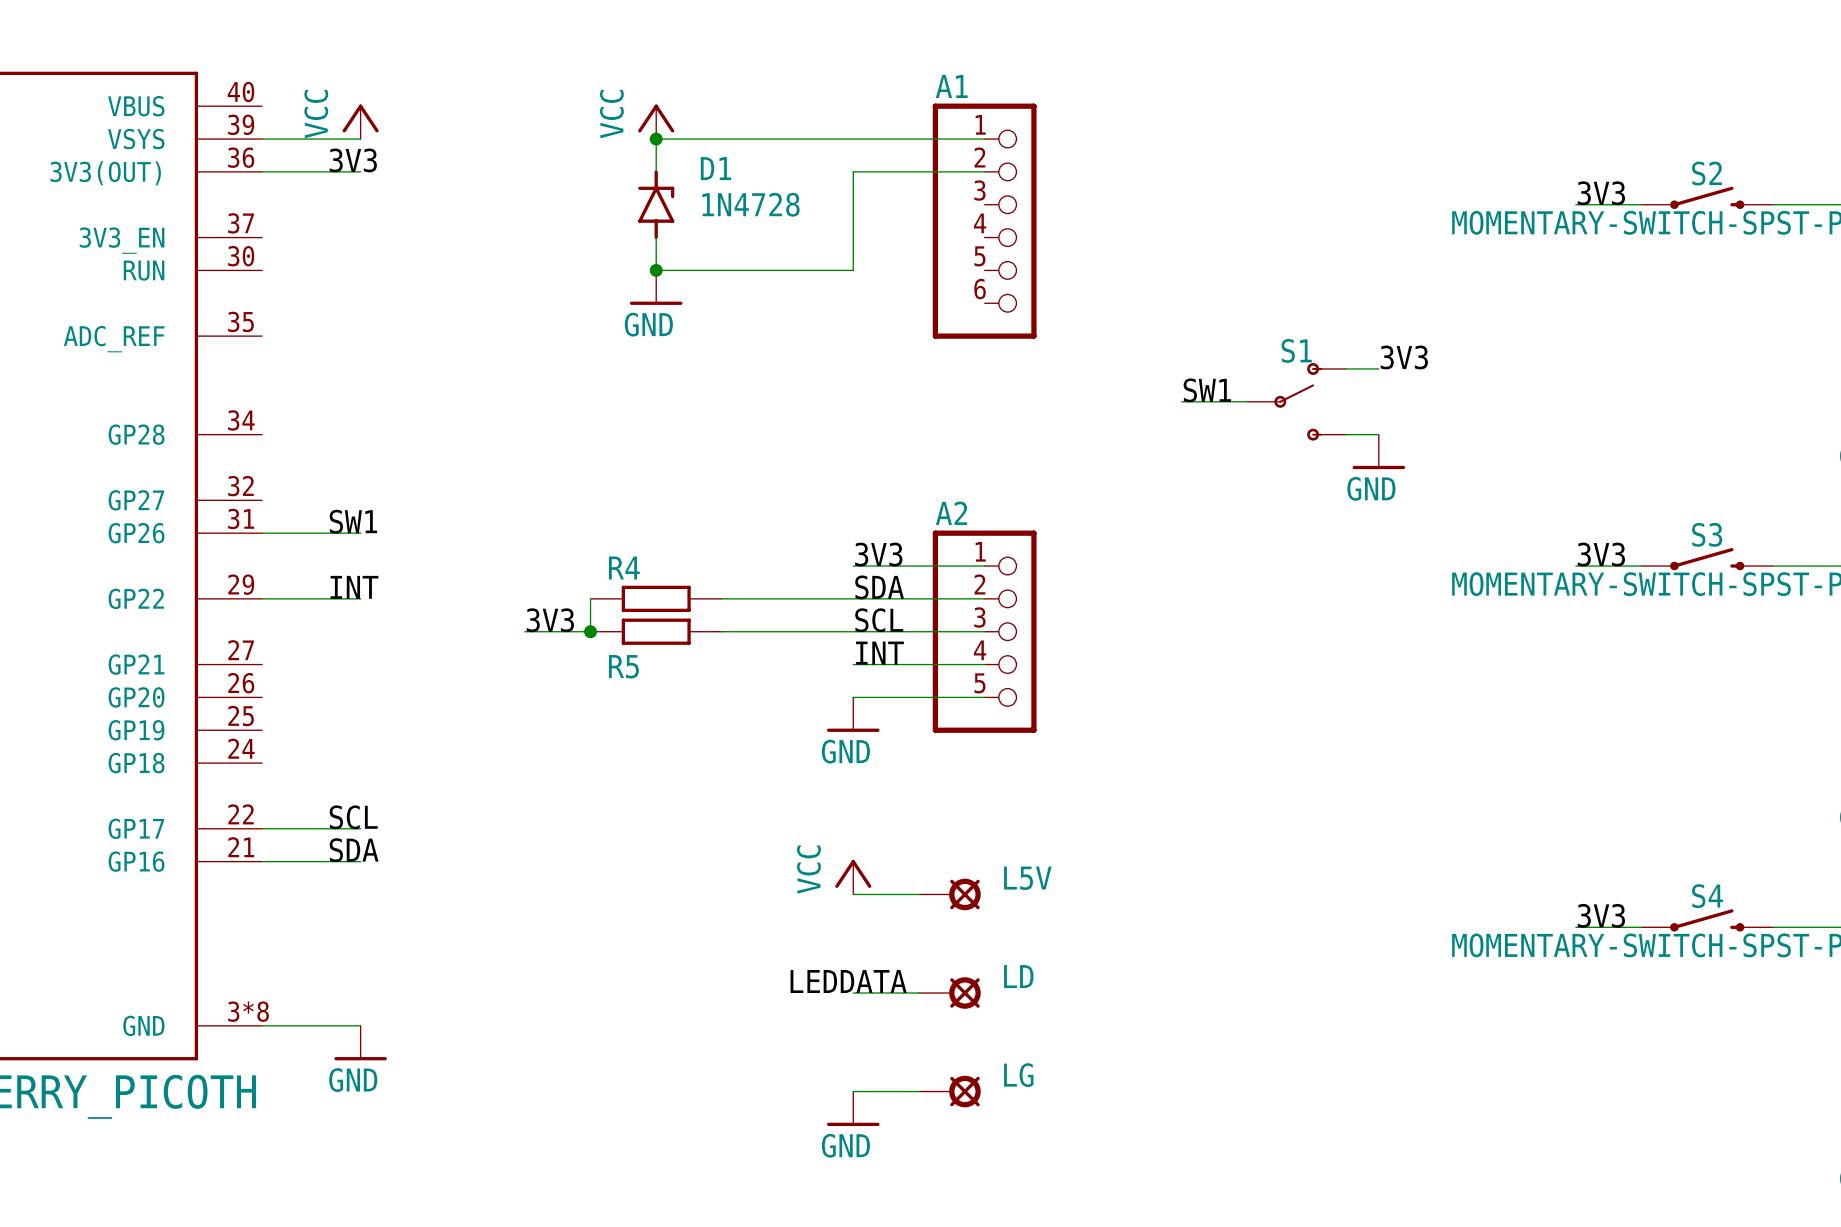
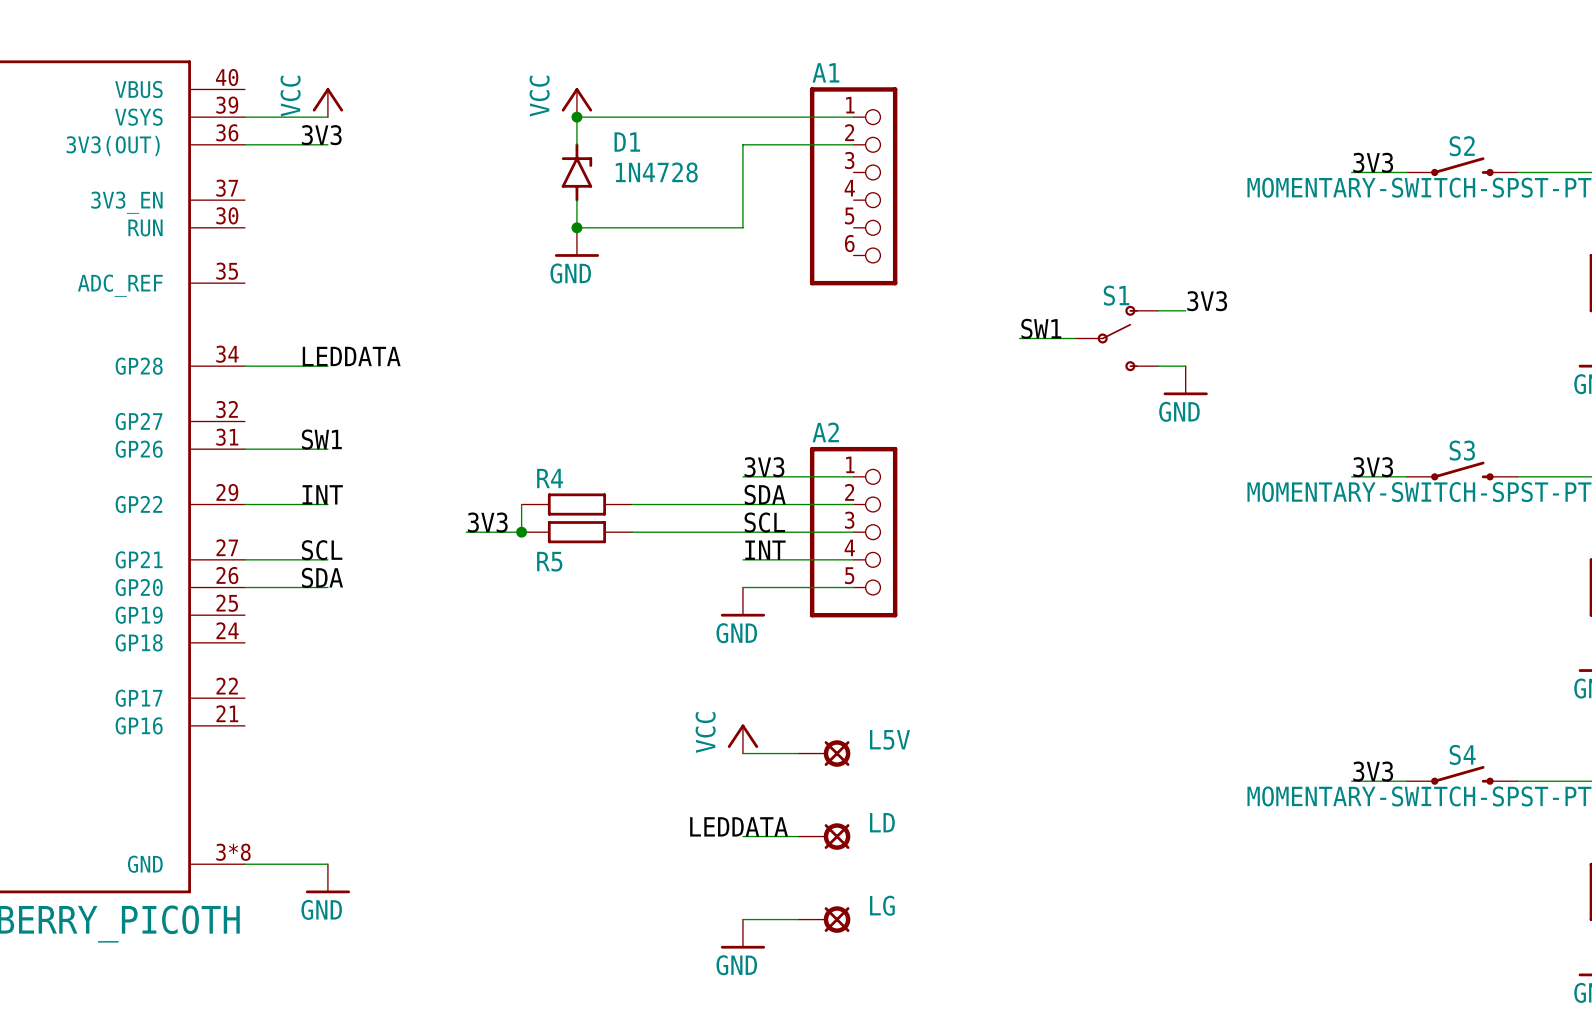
label: none -> LEDDATA (351, 356)
wire: none -> (244, 366) (327, 366)
label position: SCL (353, 817) -> SCL (322, 550)
wire: (262, 828) (360, 828) -> (244, 587) (327, 587)
label position: SDA (354, 850) -> SDA (322, 577)
wire: (262, 861) (360, 861) -> (244, 559) (327, 559)

